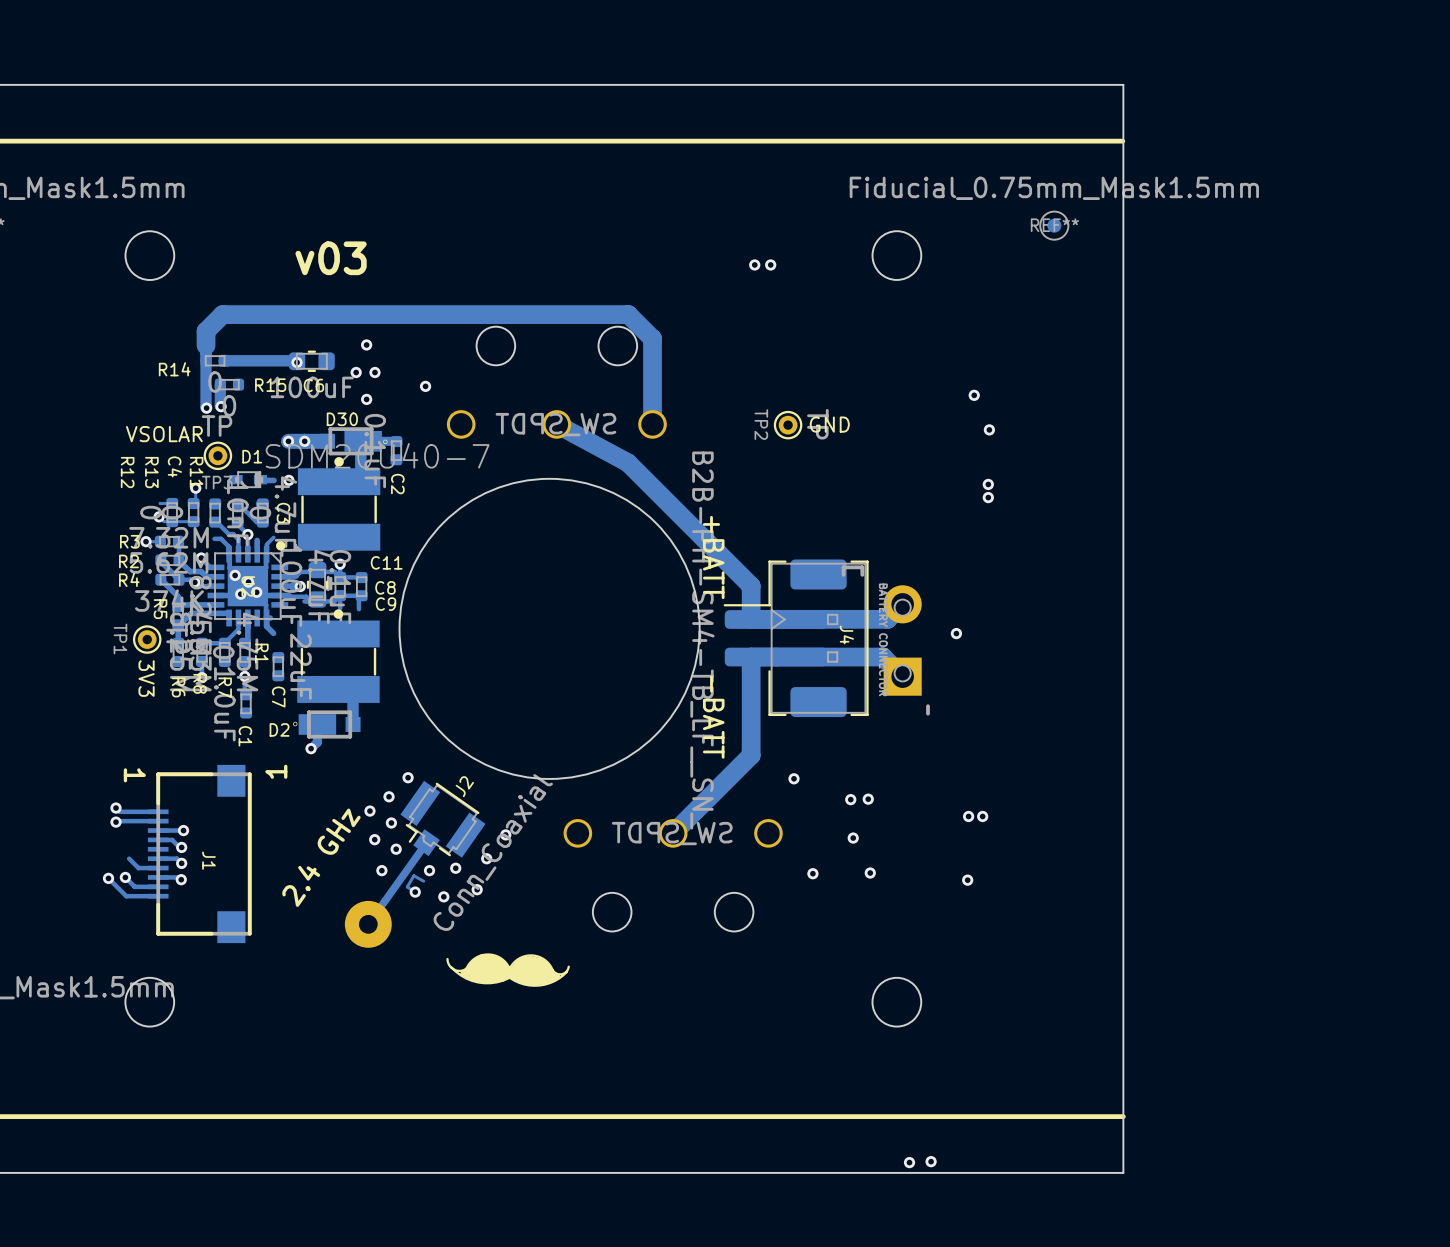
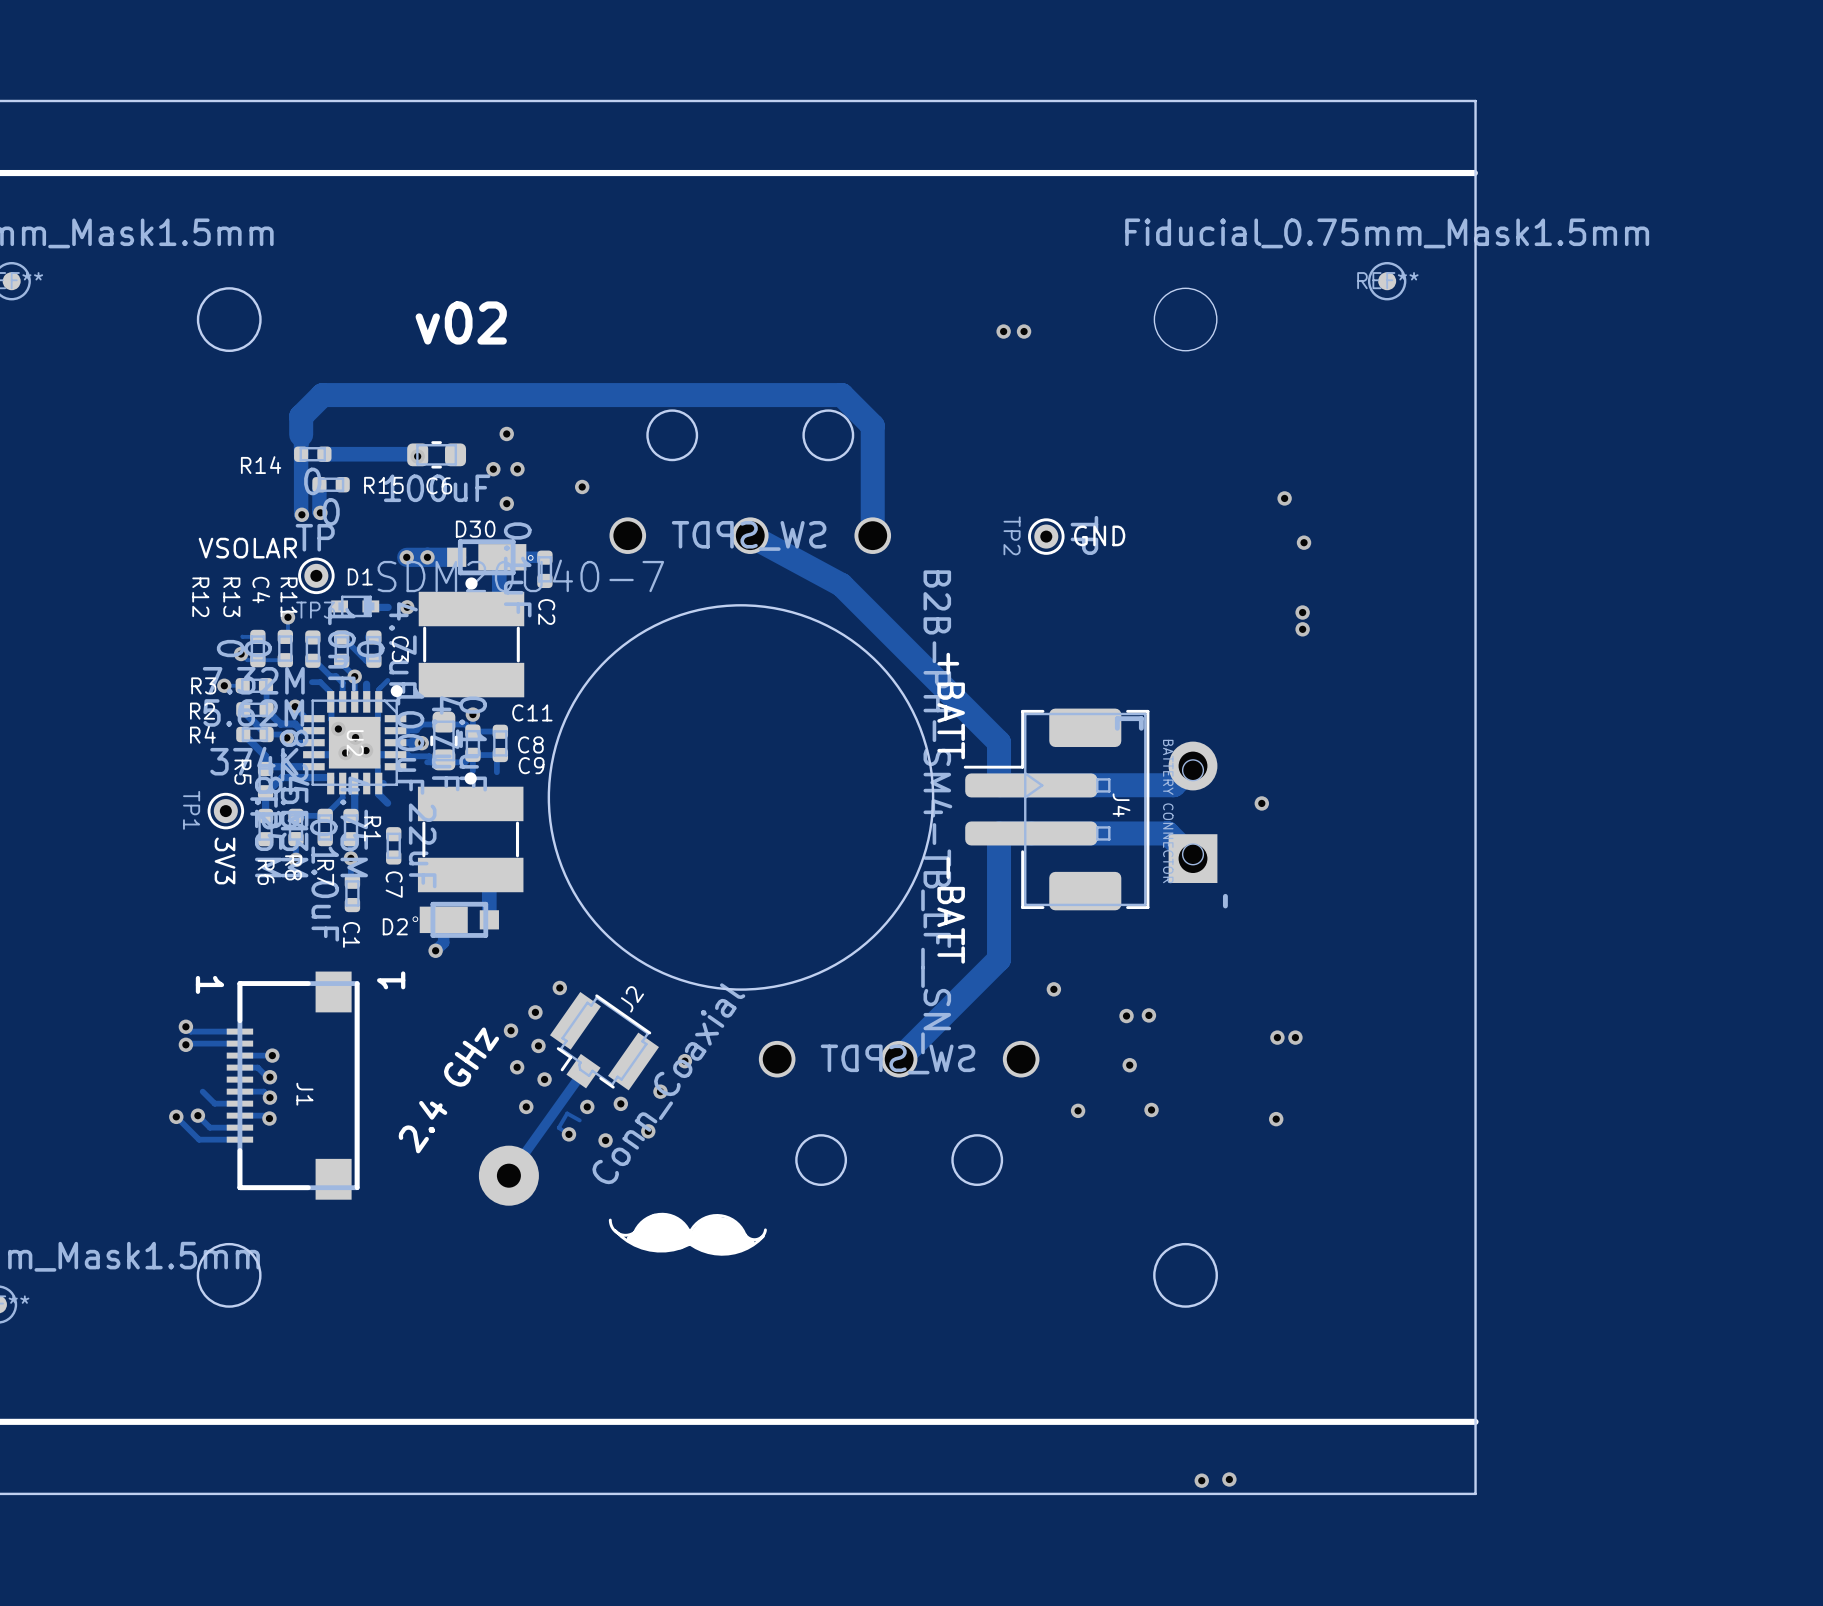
text: v03 (331, 258) -> v02 (461, 322)

